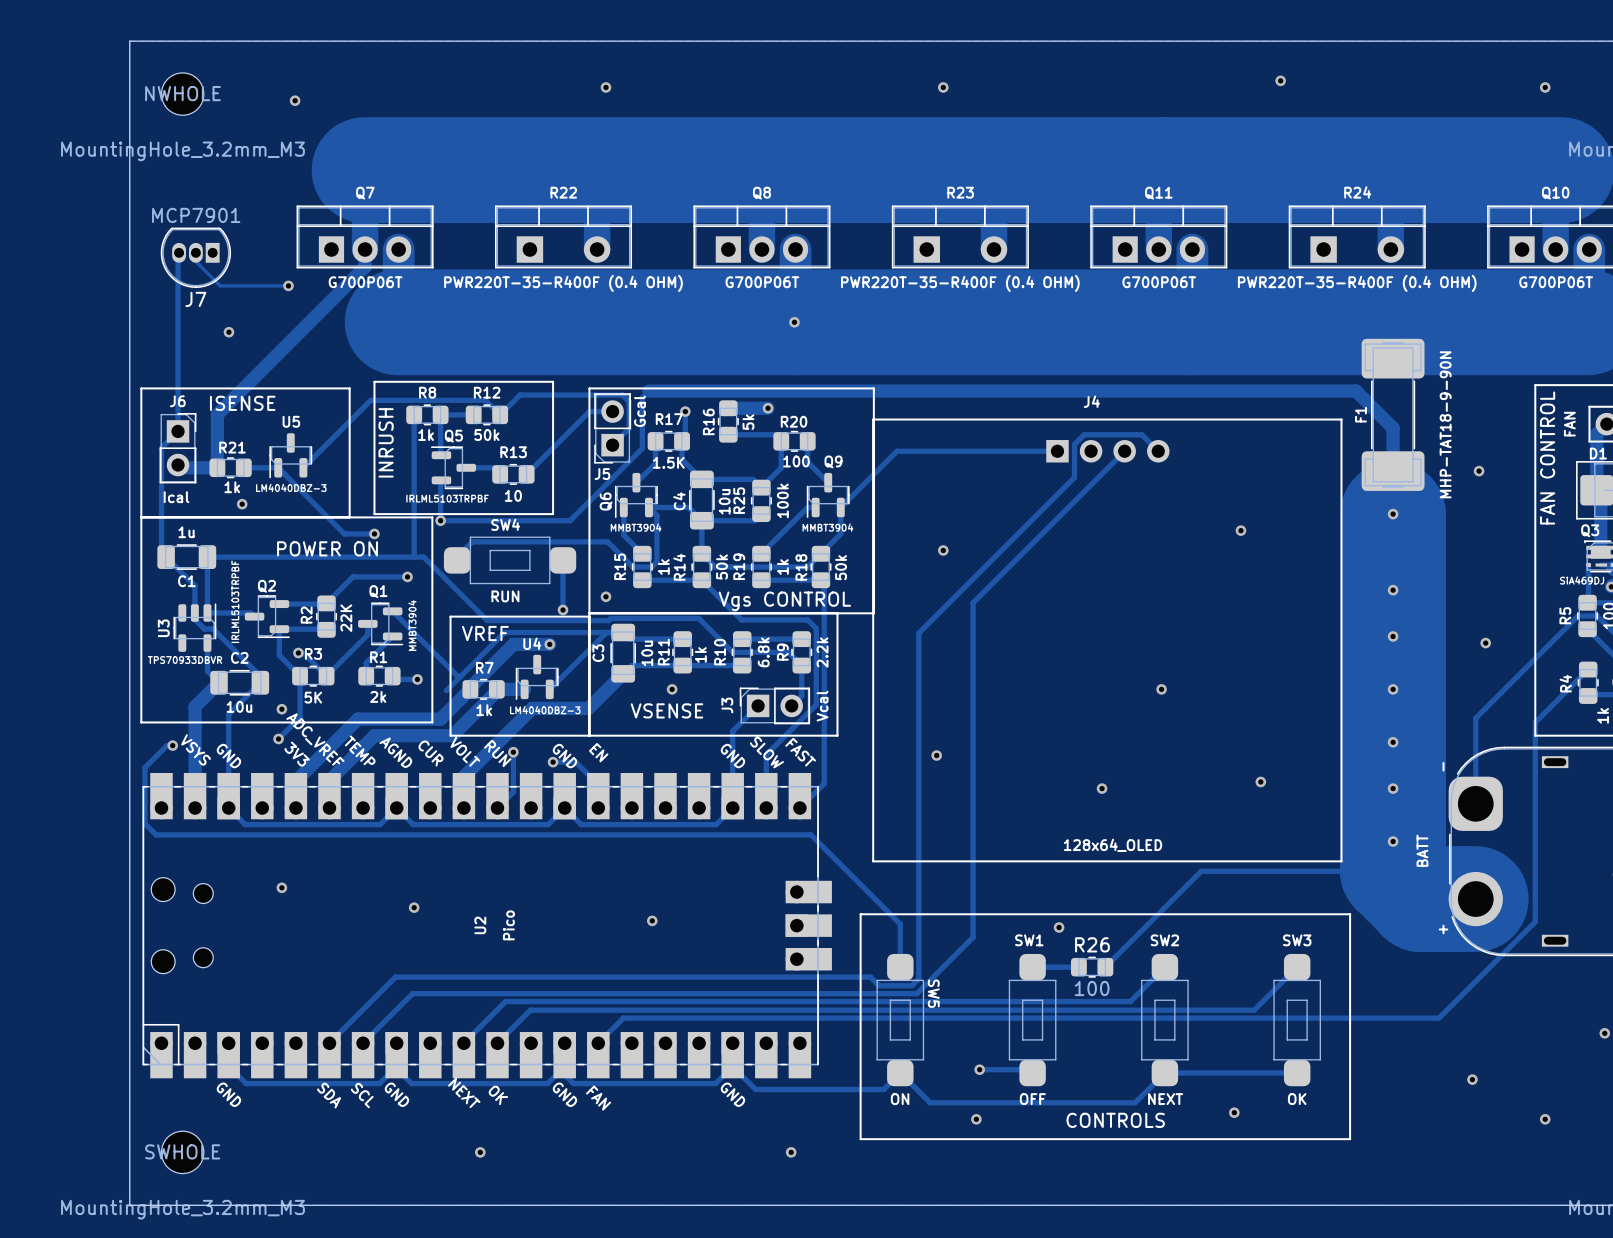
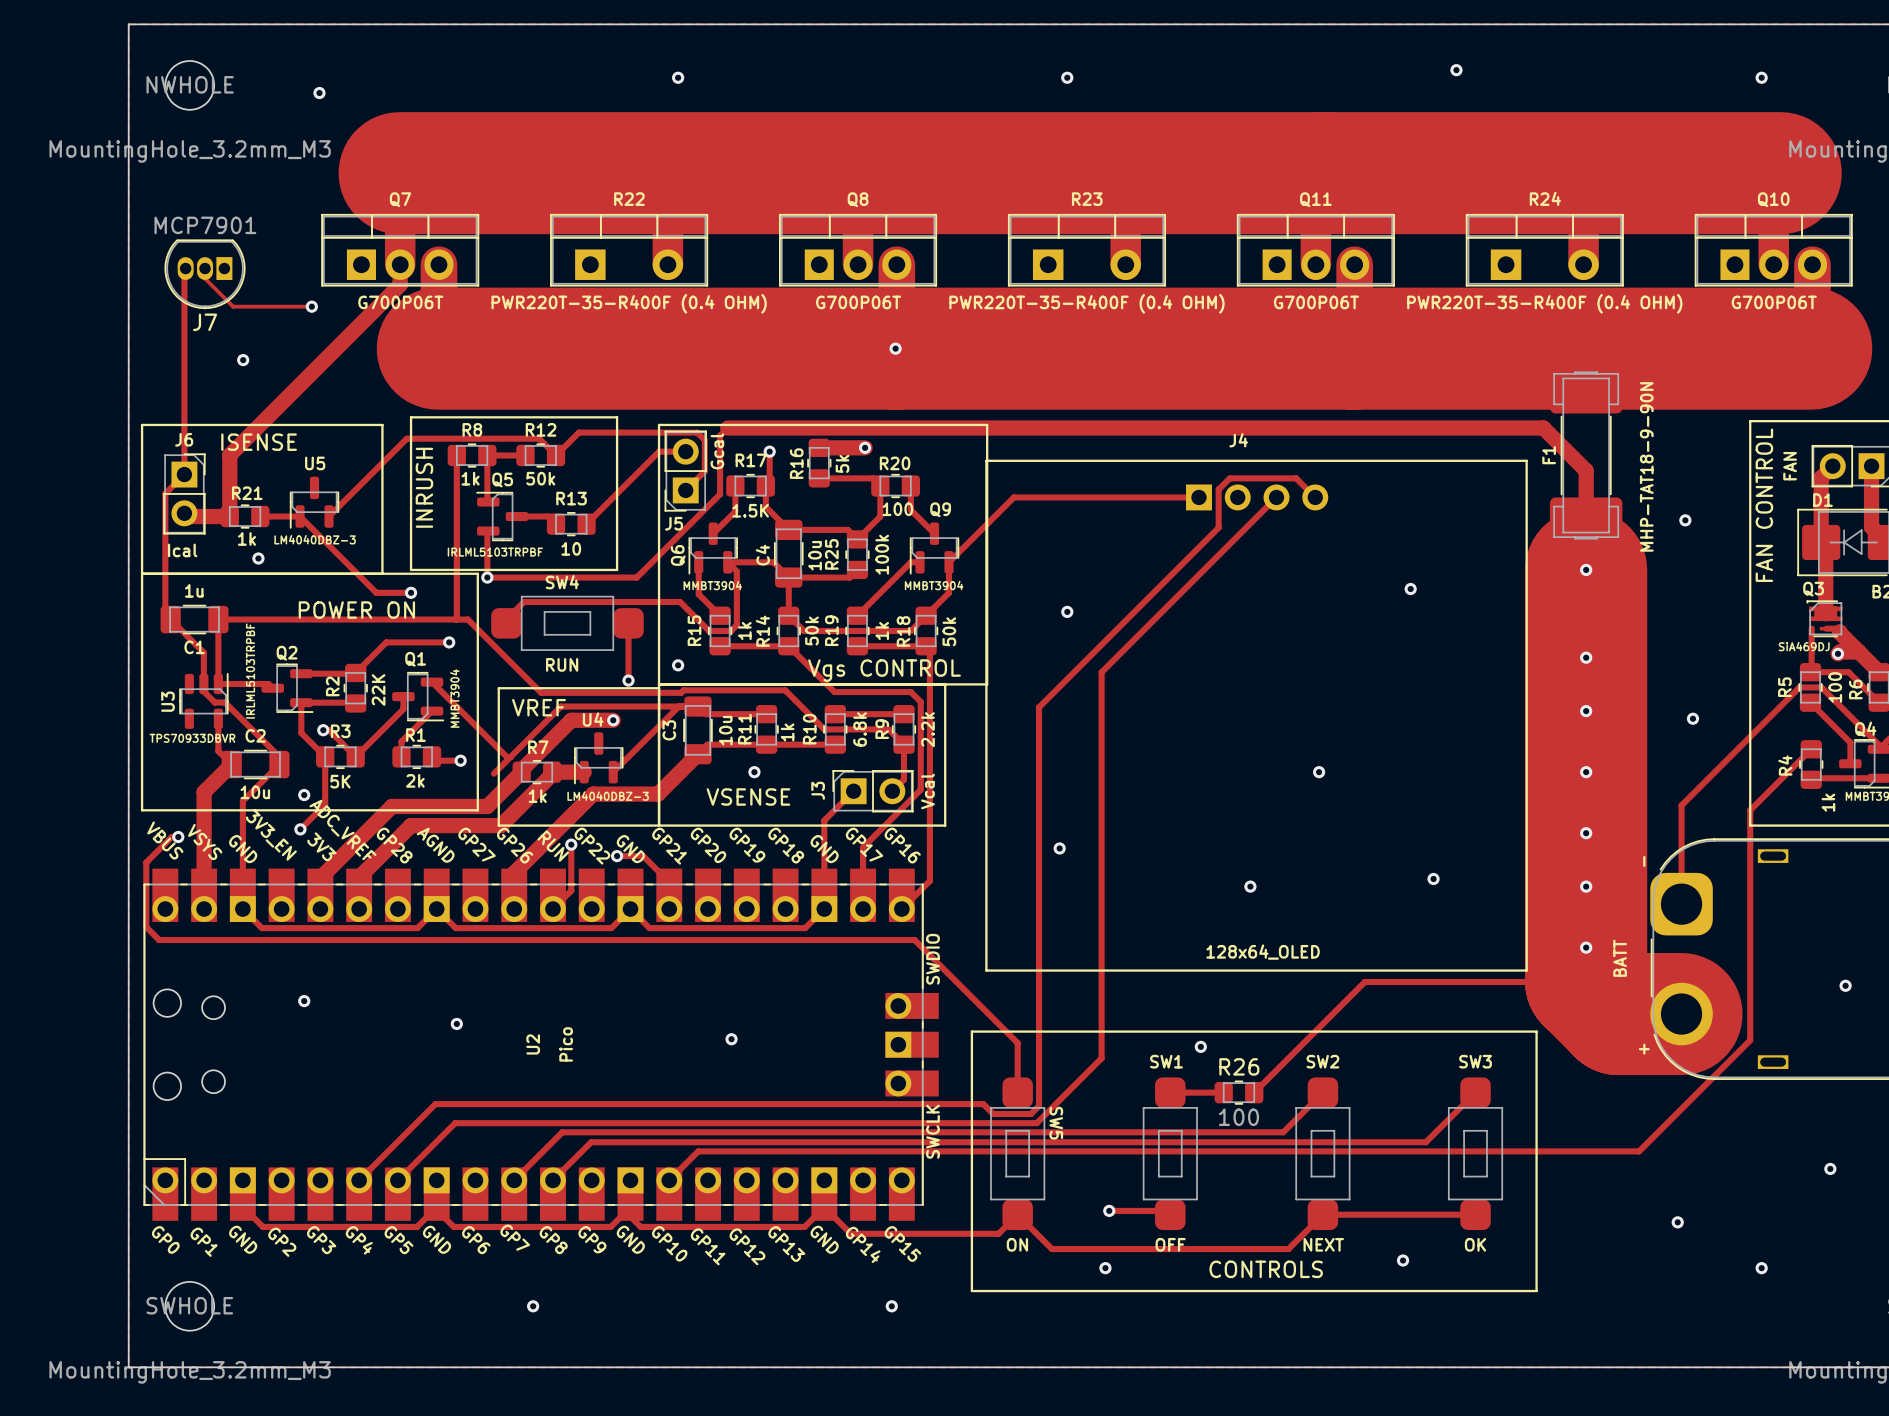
U2 footprint: [142, 772, 832, 1079] -> [143, 868, 939, 1221]

